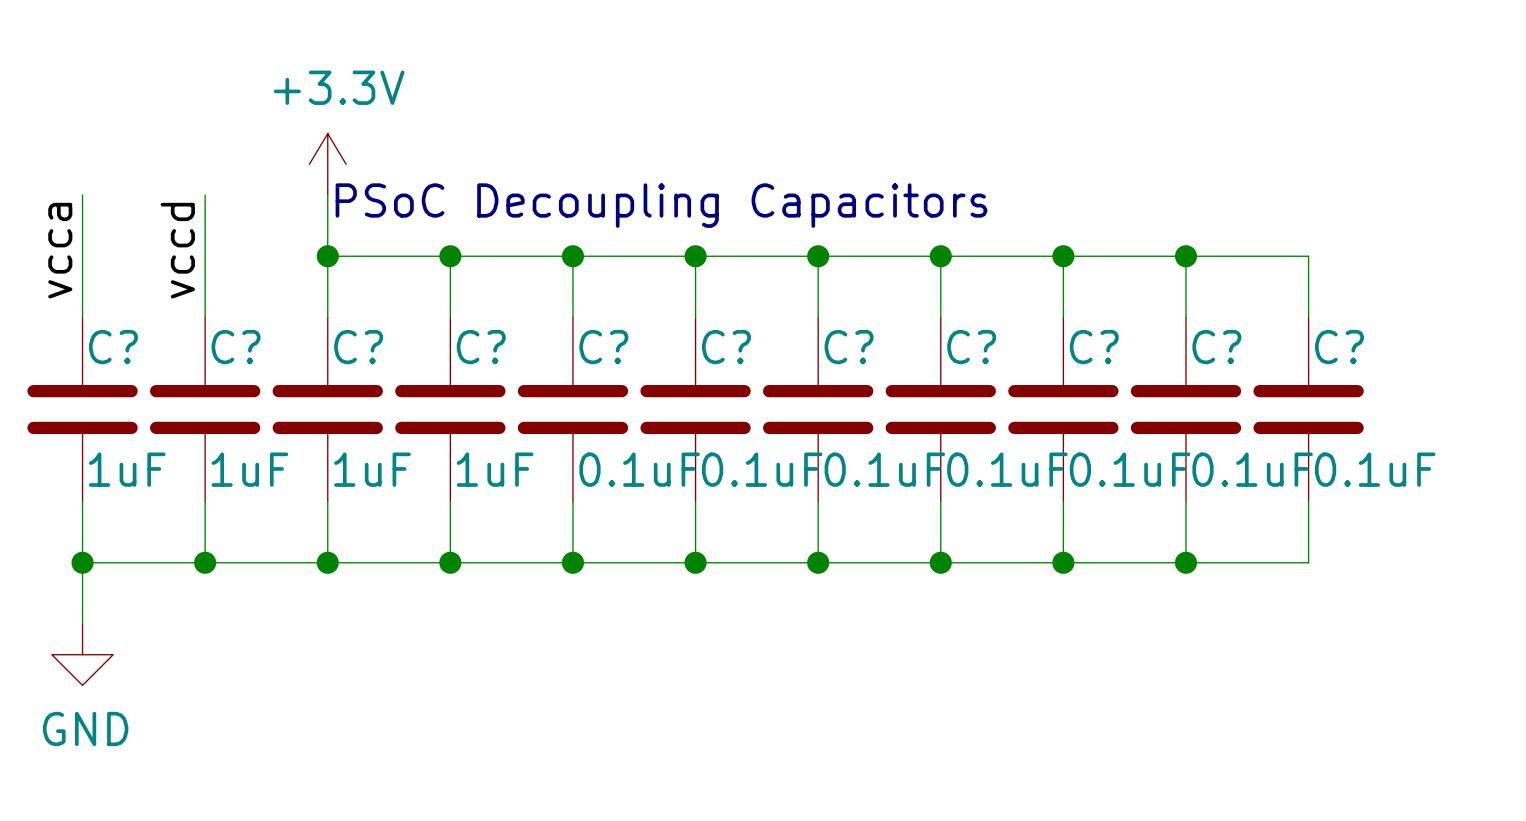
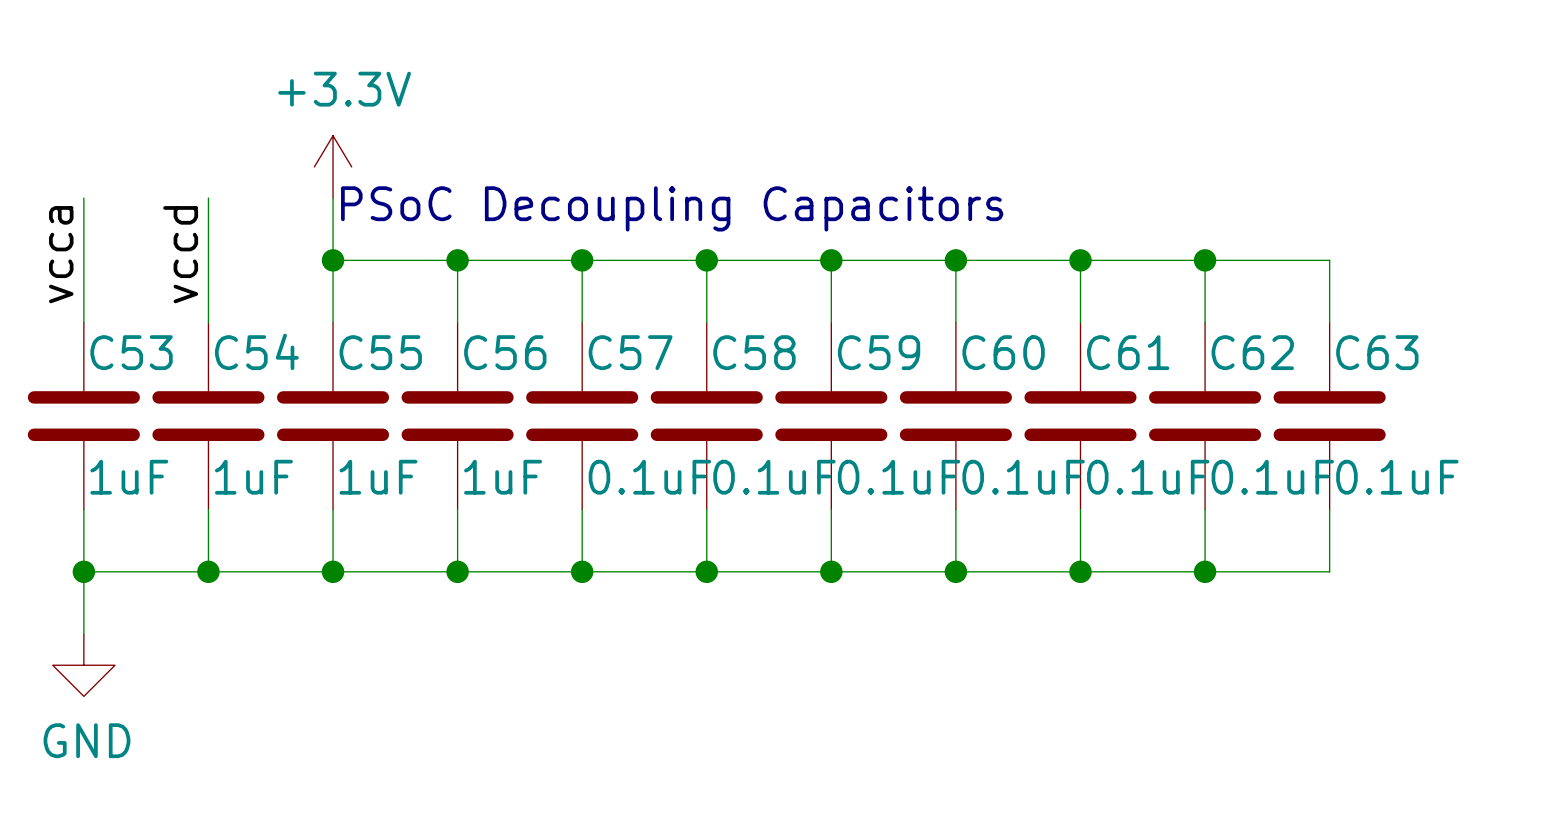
C? name: C? (113, 347) -> C53 (131, 352)
C? name: C? (236, 347) -> C54 (256, 351)
C? name: C? (358, 347) -> C55 (380, 352)
C? name: C? (481, 347) -> C56 (505, 352)
C? name: C? (603, 347) -> C57 (630, 352)
C? name: C? (726, 347) -> C58 (754, 352)
C? name: C? (849, 347) -> C59 (879, 352)
C? name: C? (971, 347) -> C60 (1003, 352)
C? name: C? (1094, 347) -> C61 (1128, 352)
C? name: C? (1216, 347) -> C62 (1252, 352)
C? name: C? (1339, 347) -> C63 (1377, 352)

